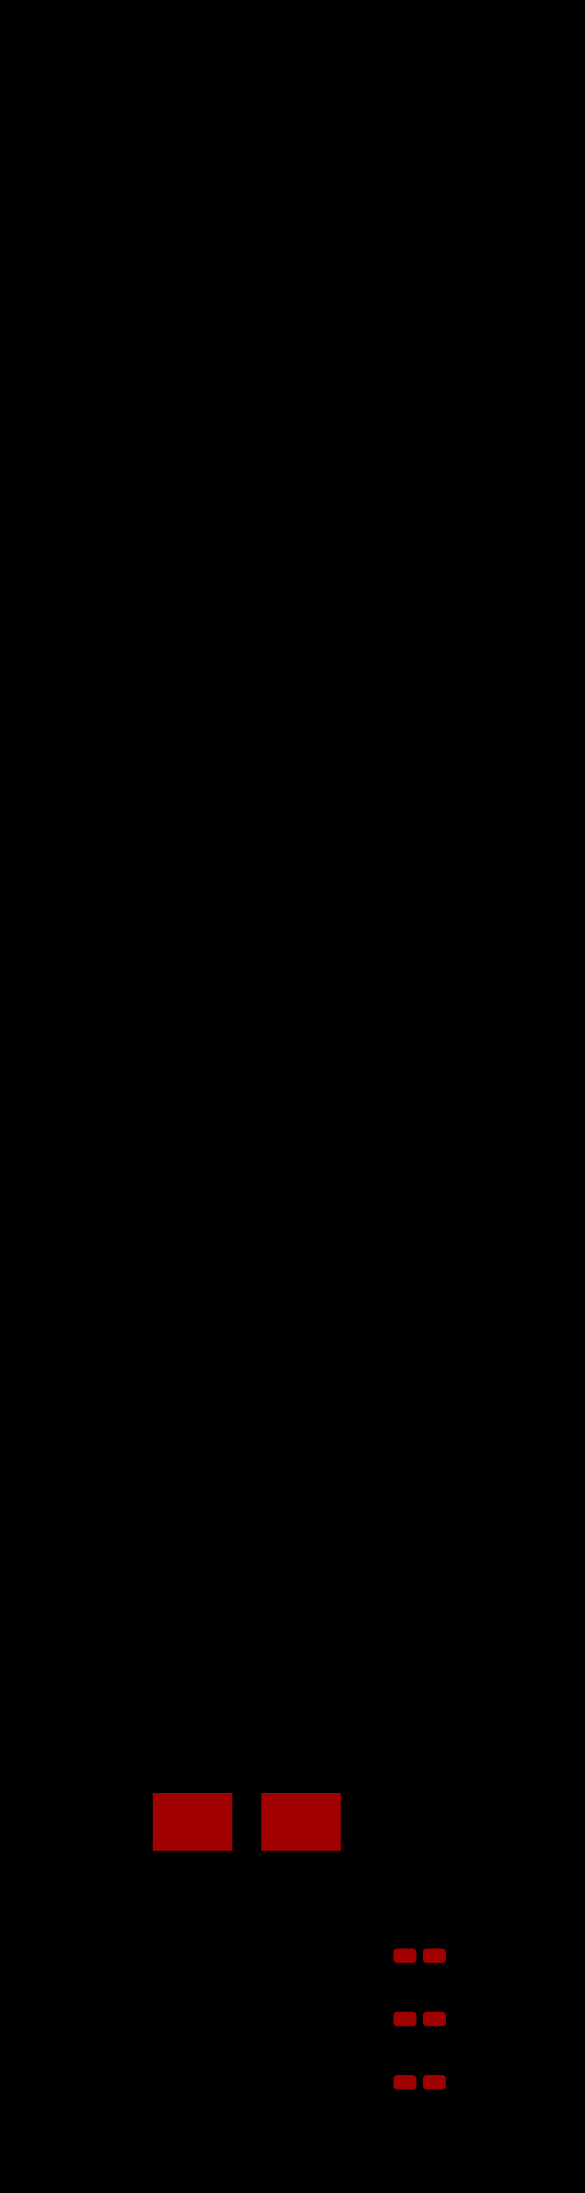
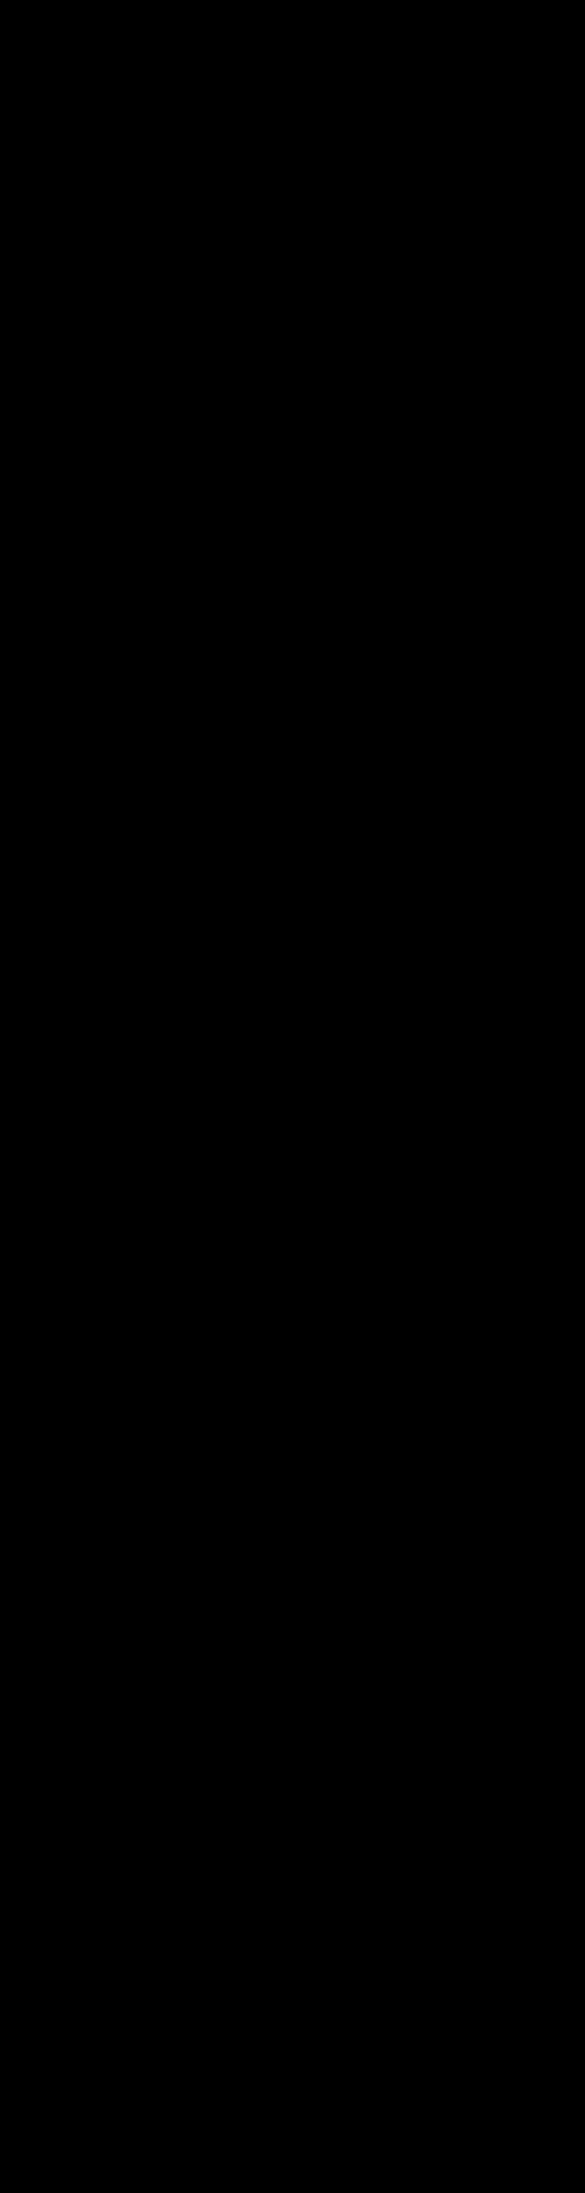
part: (246, 1821) -> none
part: (419, 1955) -> none
part: (419, 2018) -> none
part: (419, 2082) -> none

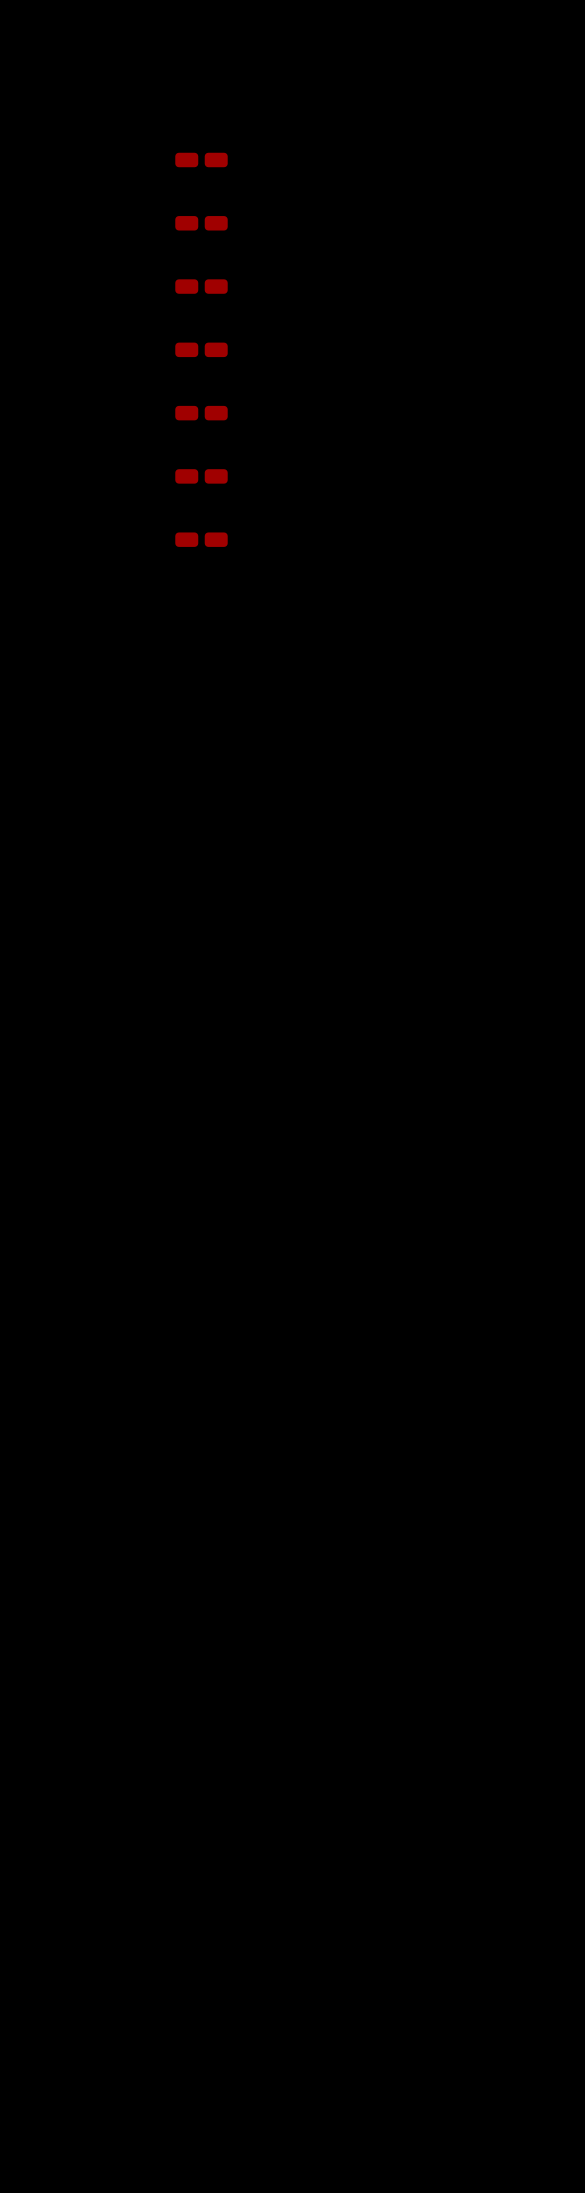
part: none -> (201, 159)
part: none -> (201, 223)
part: none -> (201, 286)
part: none -> (201, 349)
part: none -> (201, 413)
part: none -> (201, 476)
part: none -> (201, 539)

